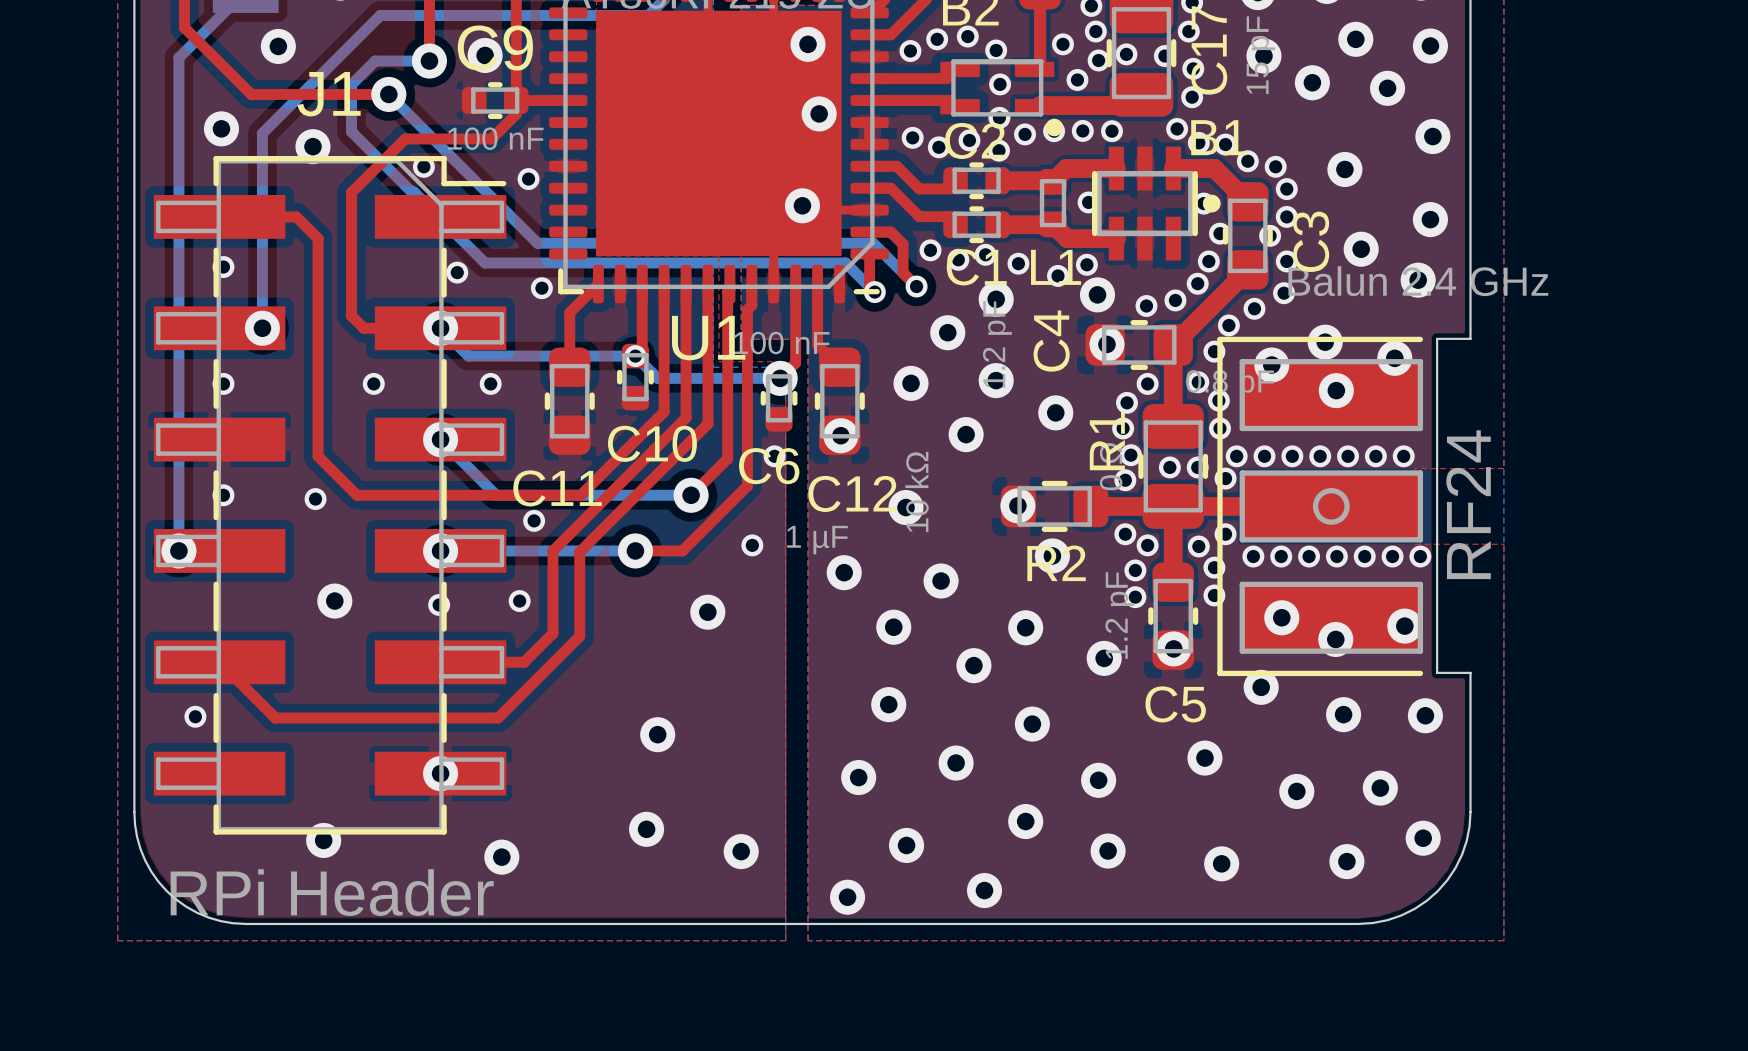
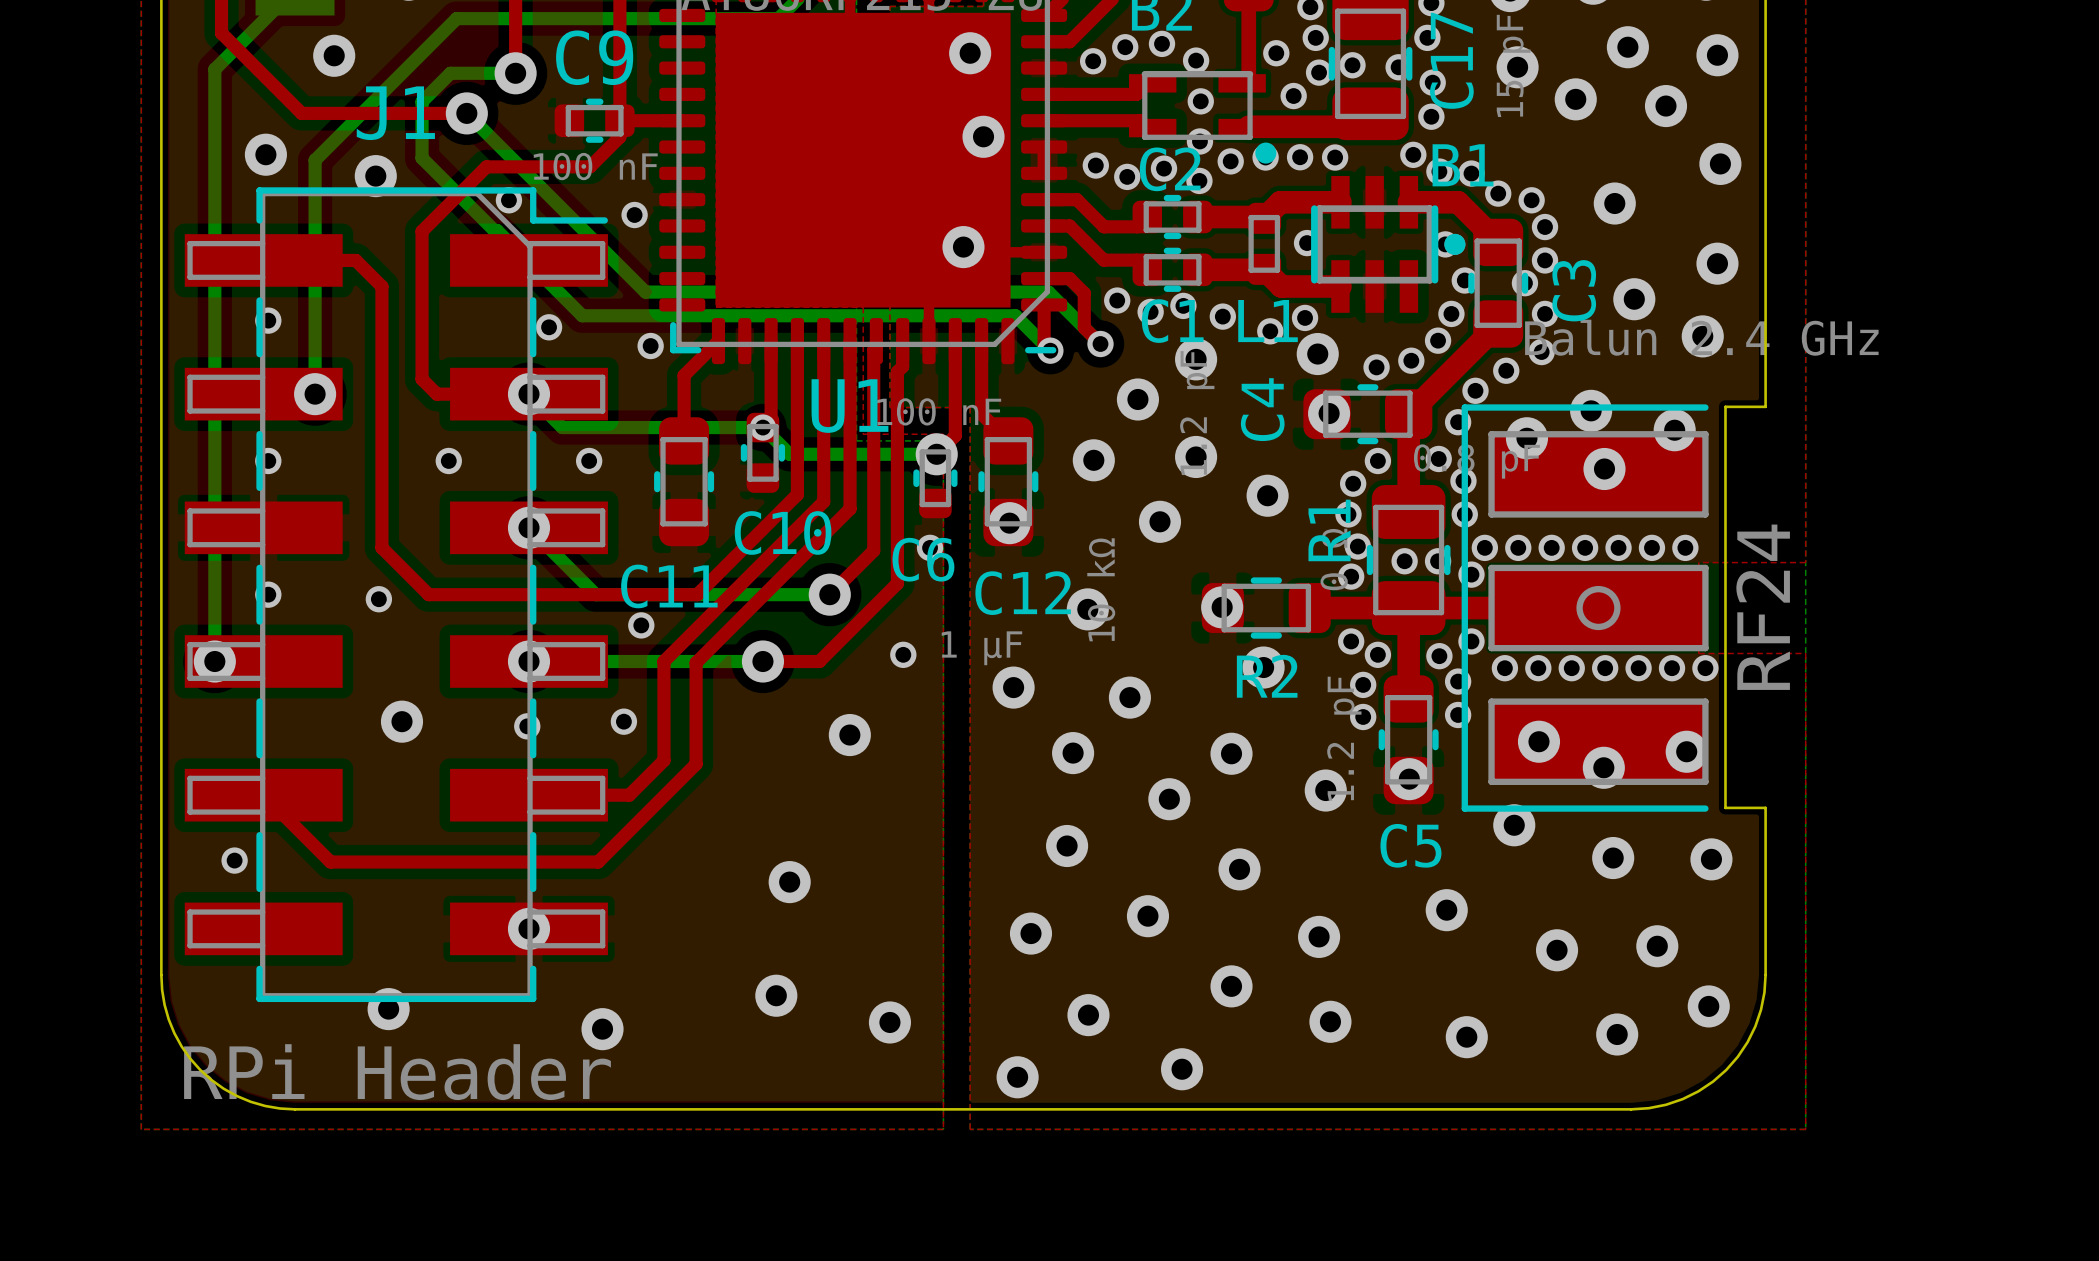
via: (485, 55) -> none

